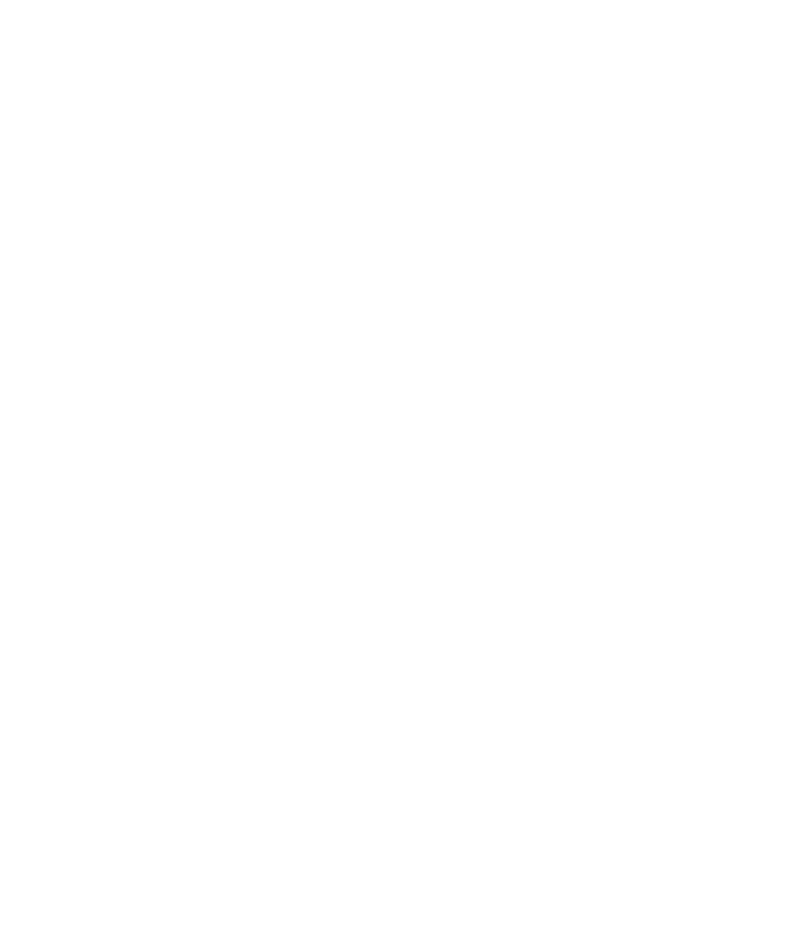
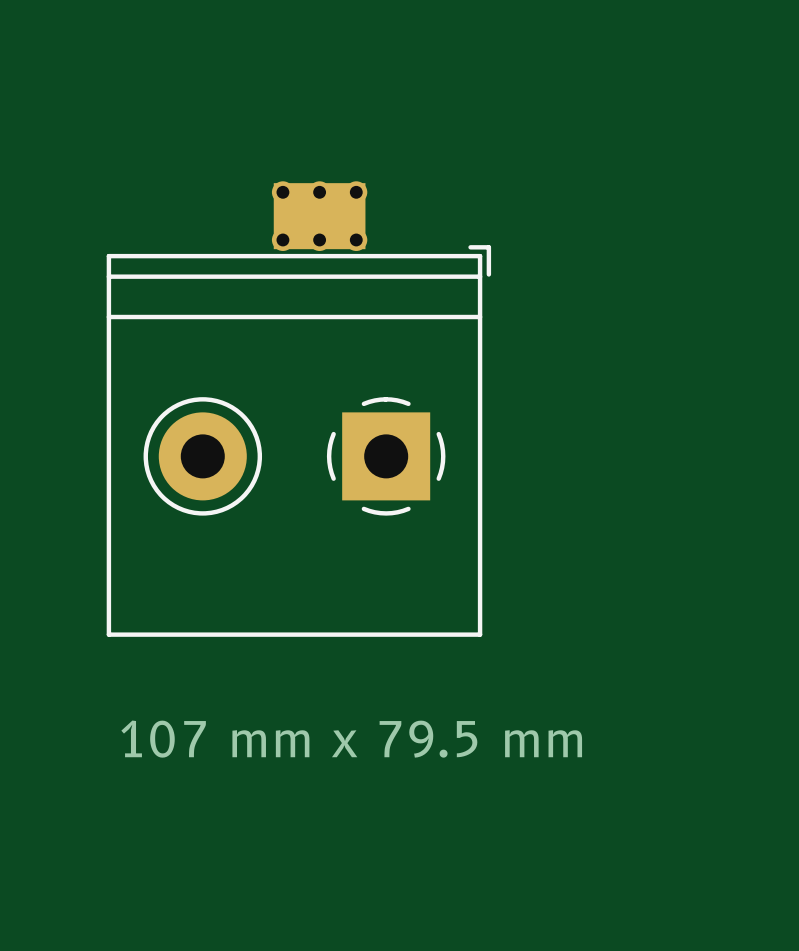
part: none -> (319, 216)
part: none -> (298, 440)
text: none -> 107 mm x 79.5 mm (351, 739)

